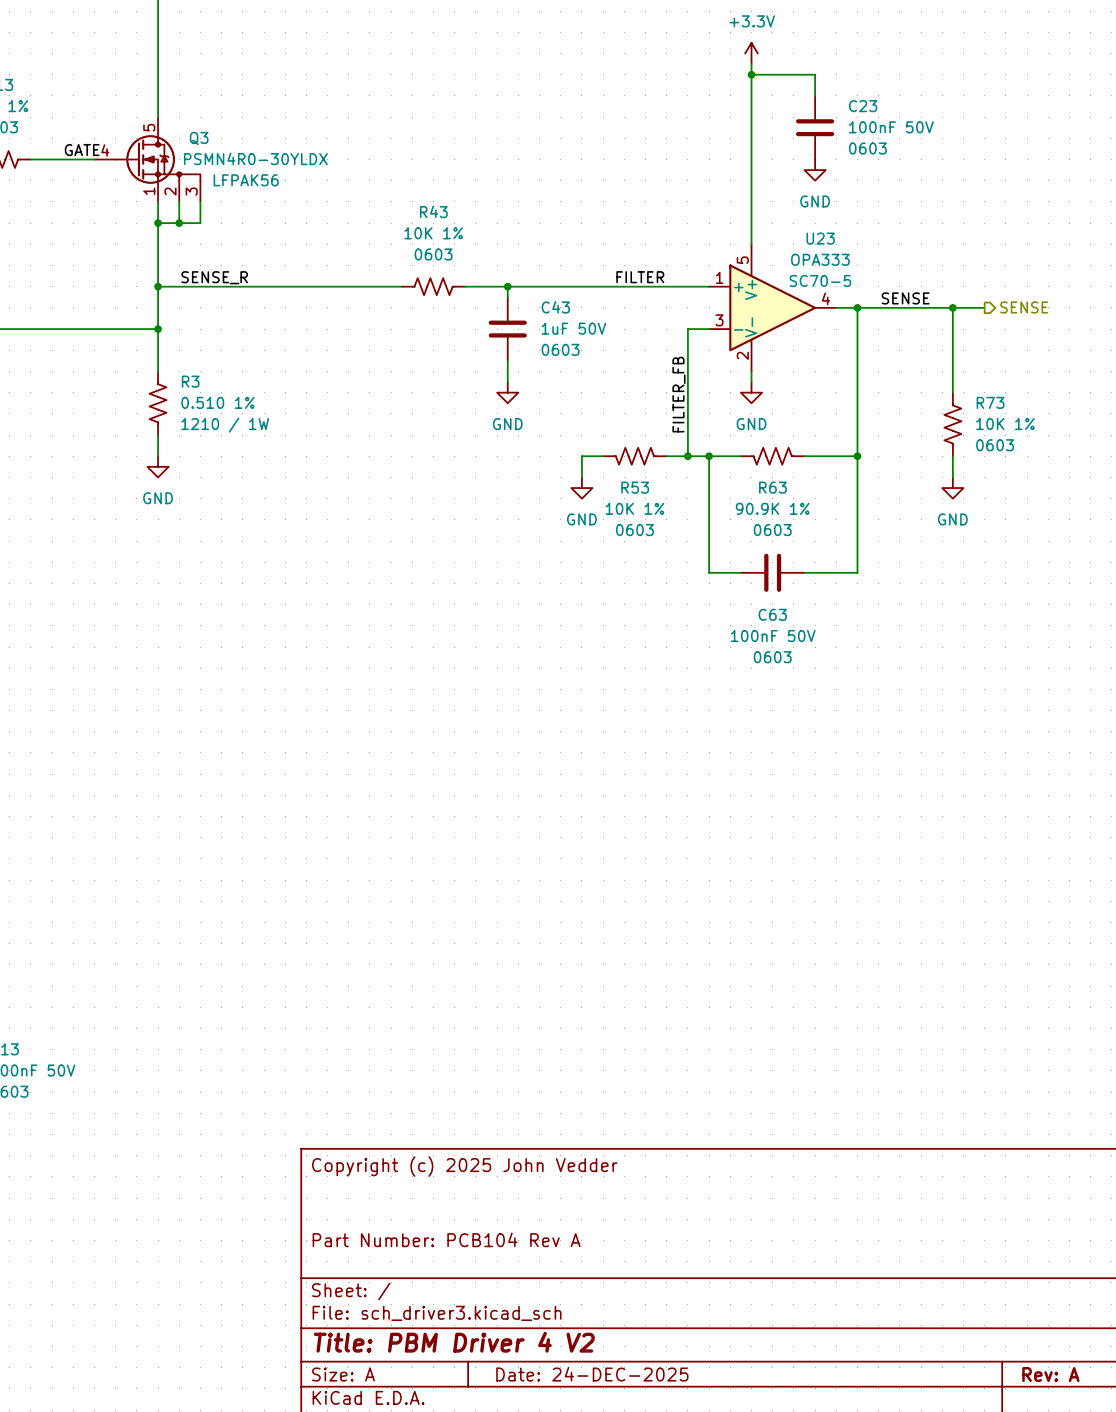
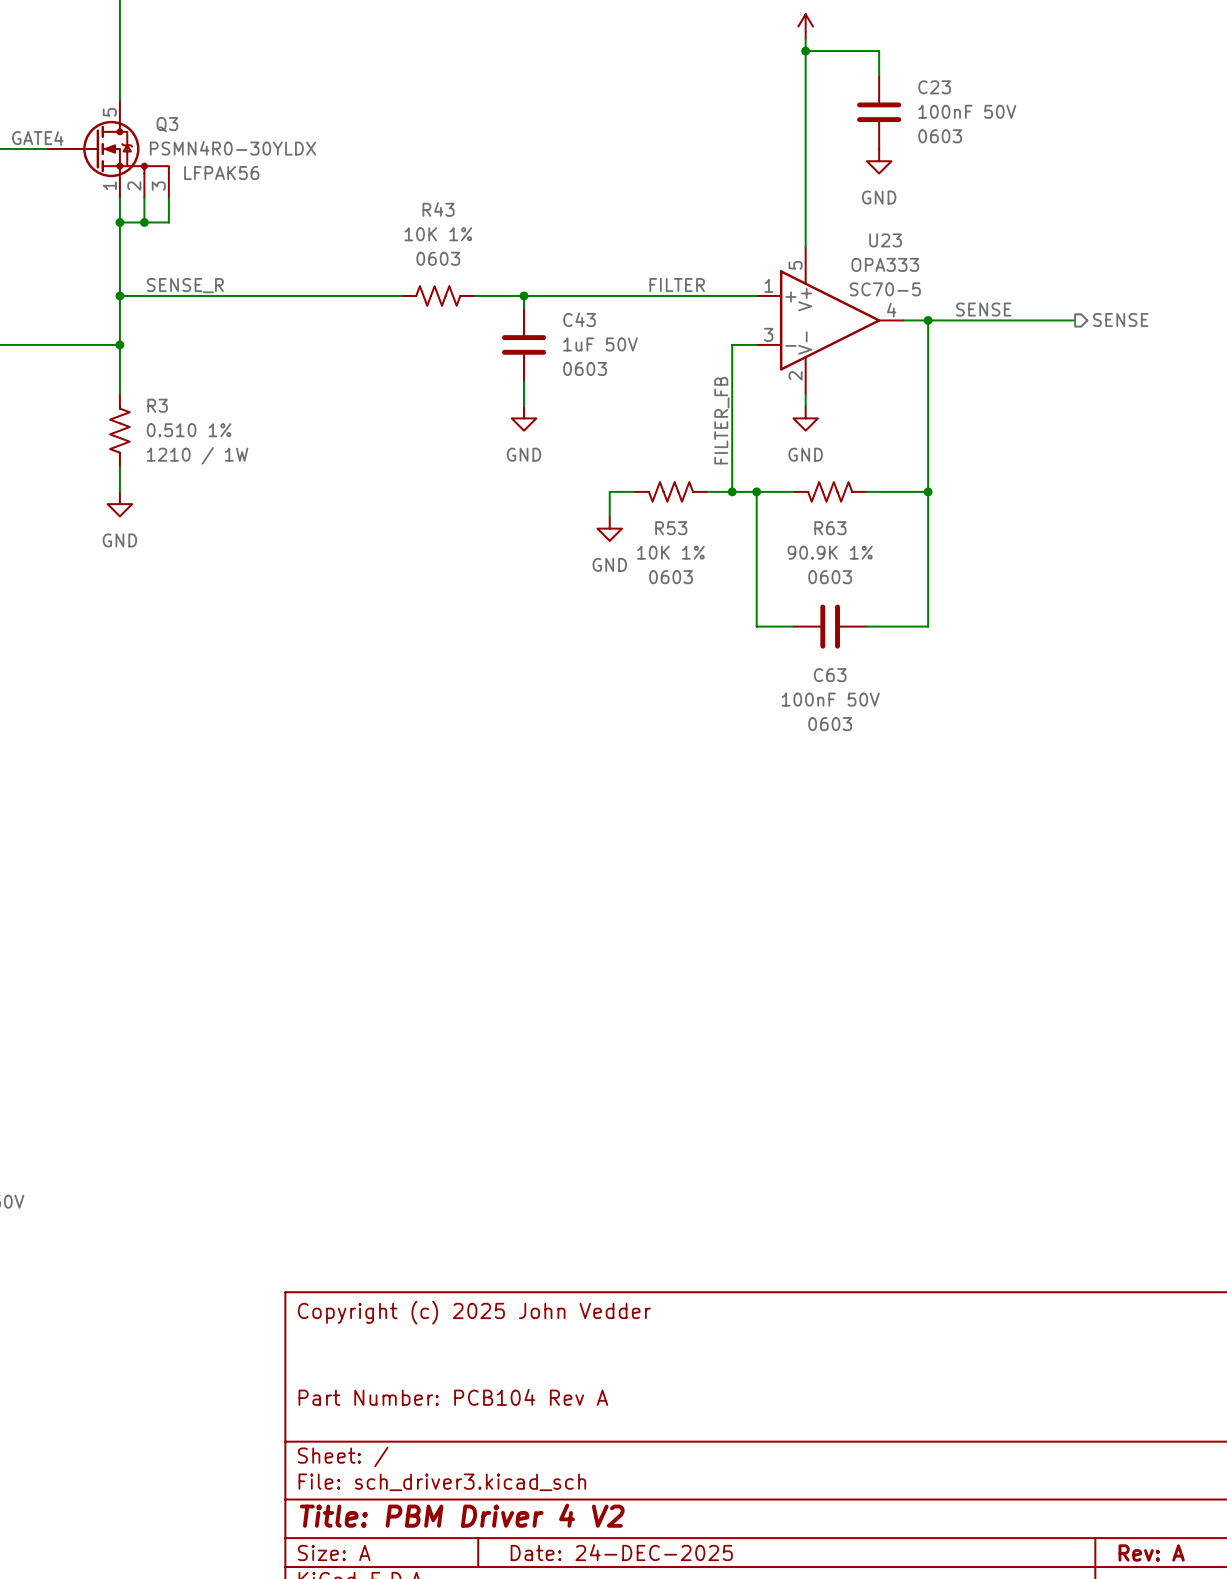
wire: (952, 307) (952, 392) -> none
junction: (952, 307) -> none
R73: 10K 1% (952, 424) -> none
wire: (952, 456) (952, 477) -> none
power symbol: GND (952, 488) -> none

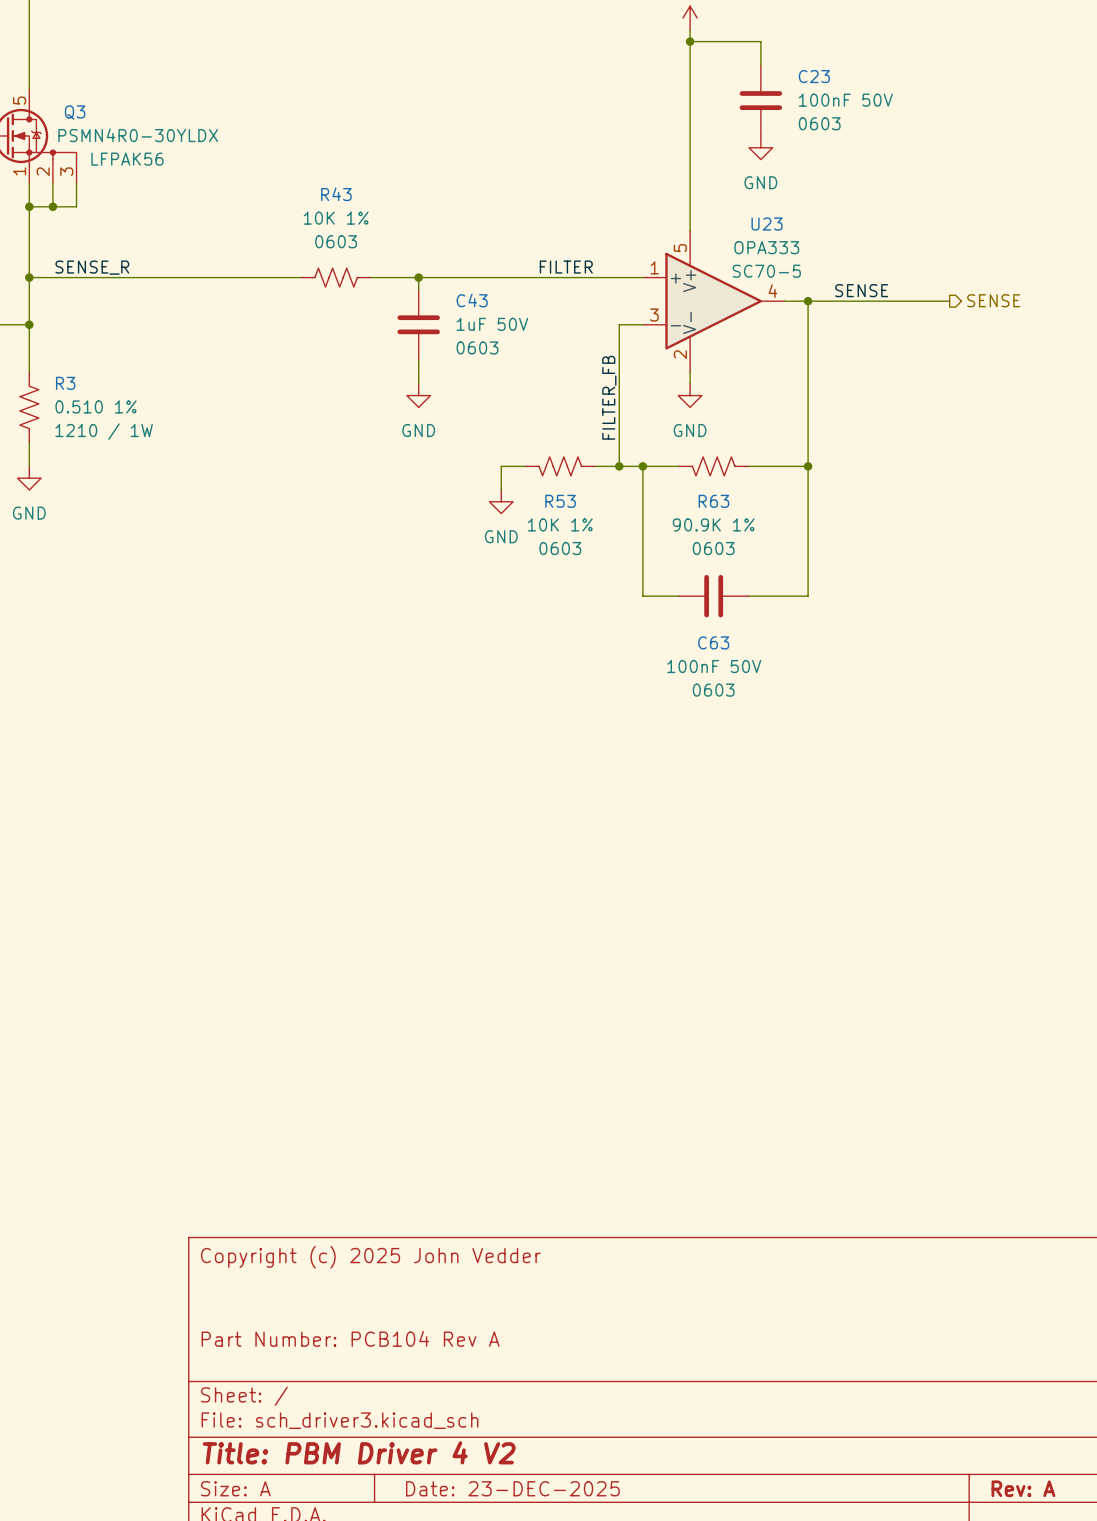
title block: Date: 24-DEC-2025 (621, 1552) -> Date: 23-DEC-2025 (512, 1488)

